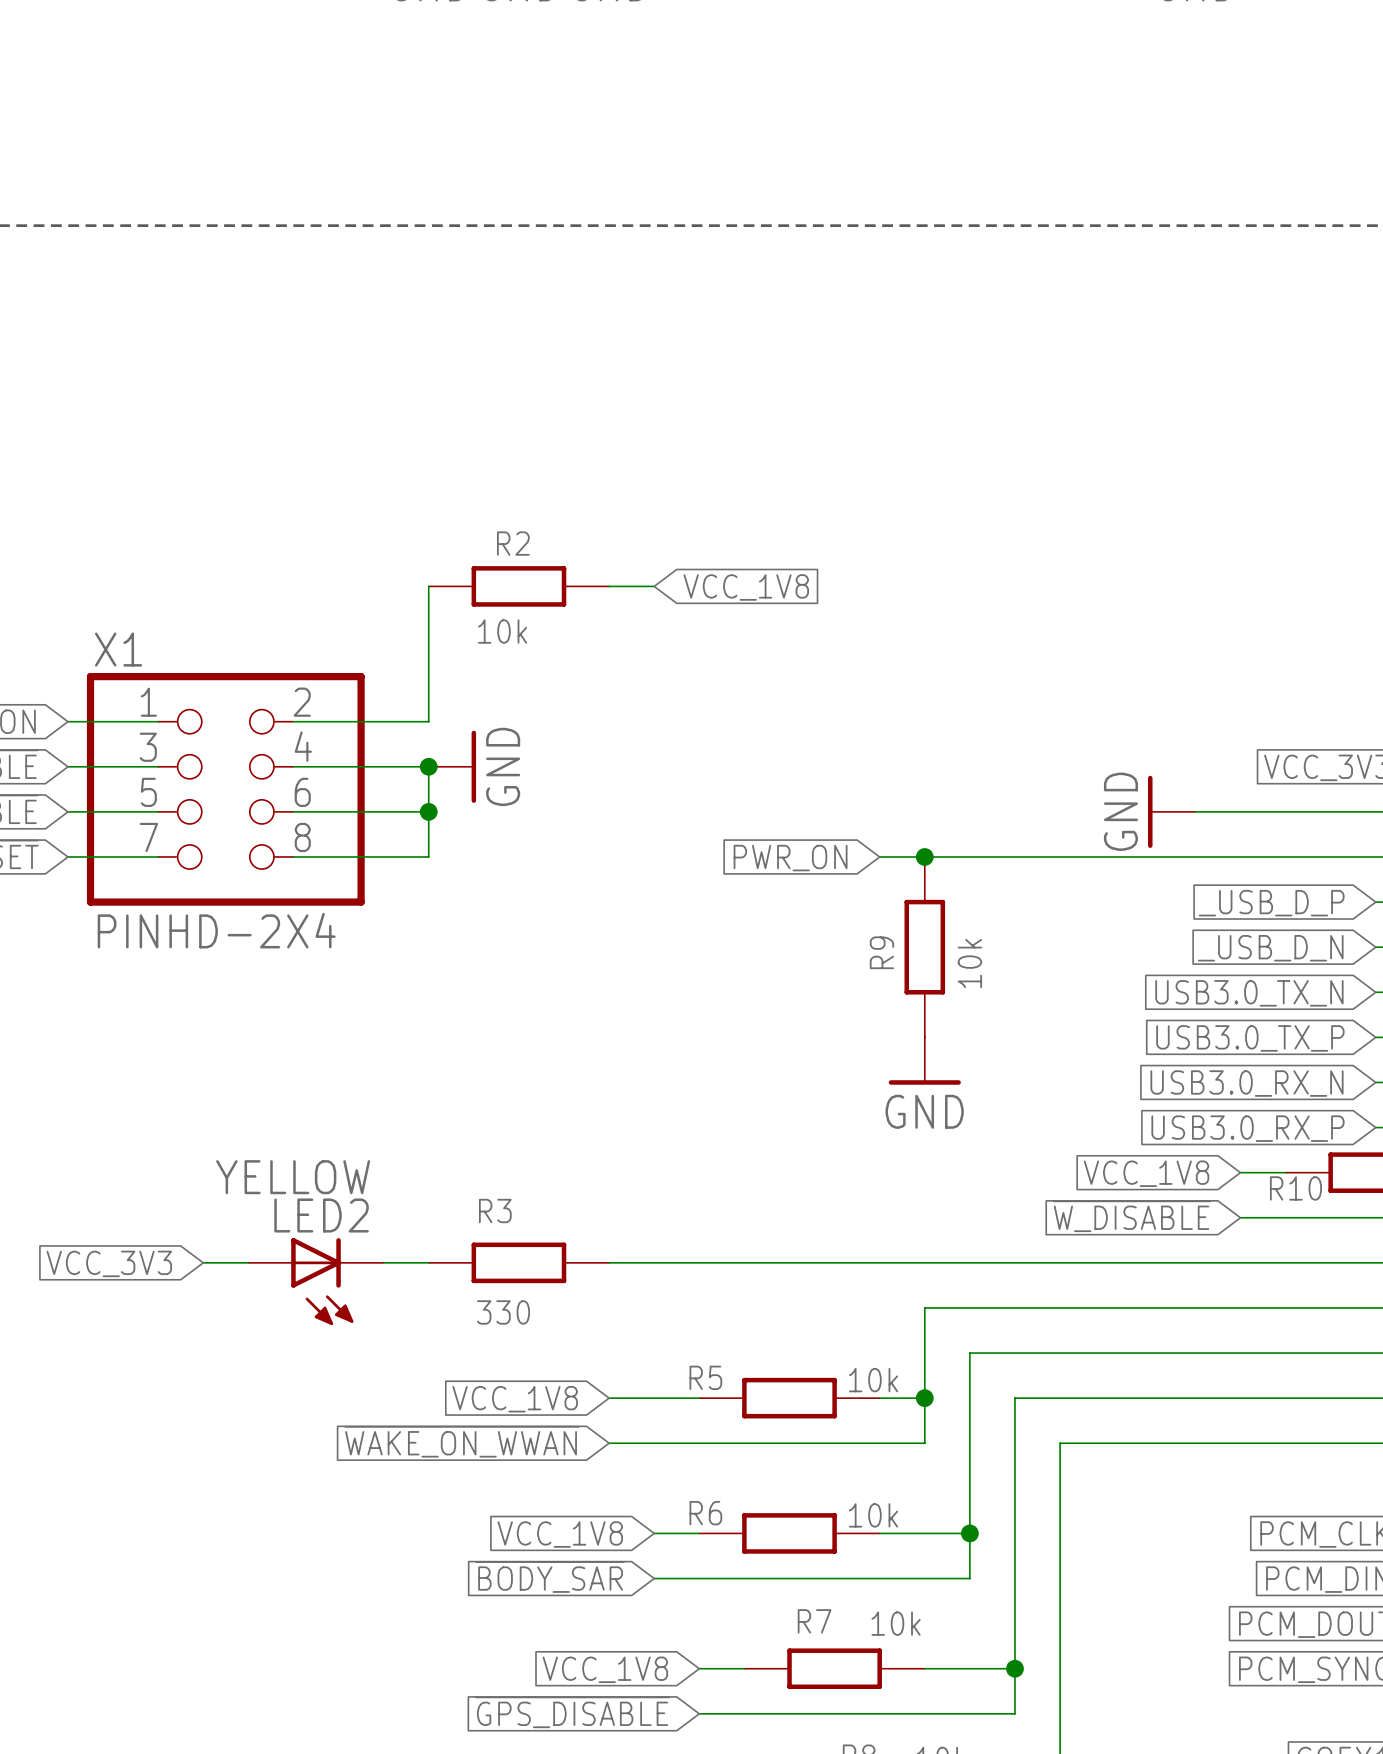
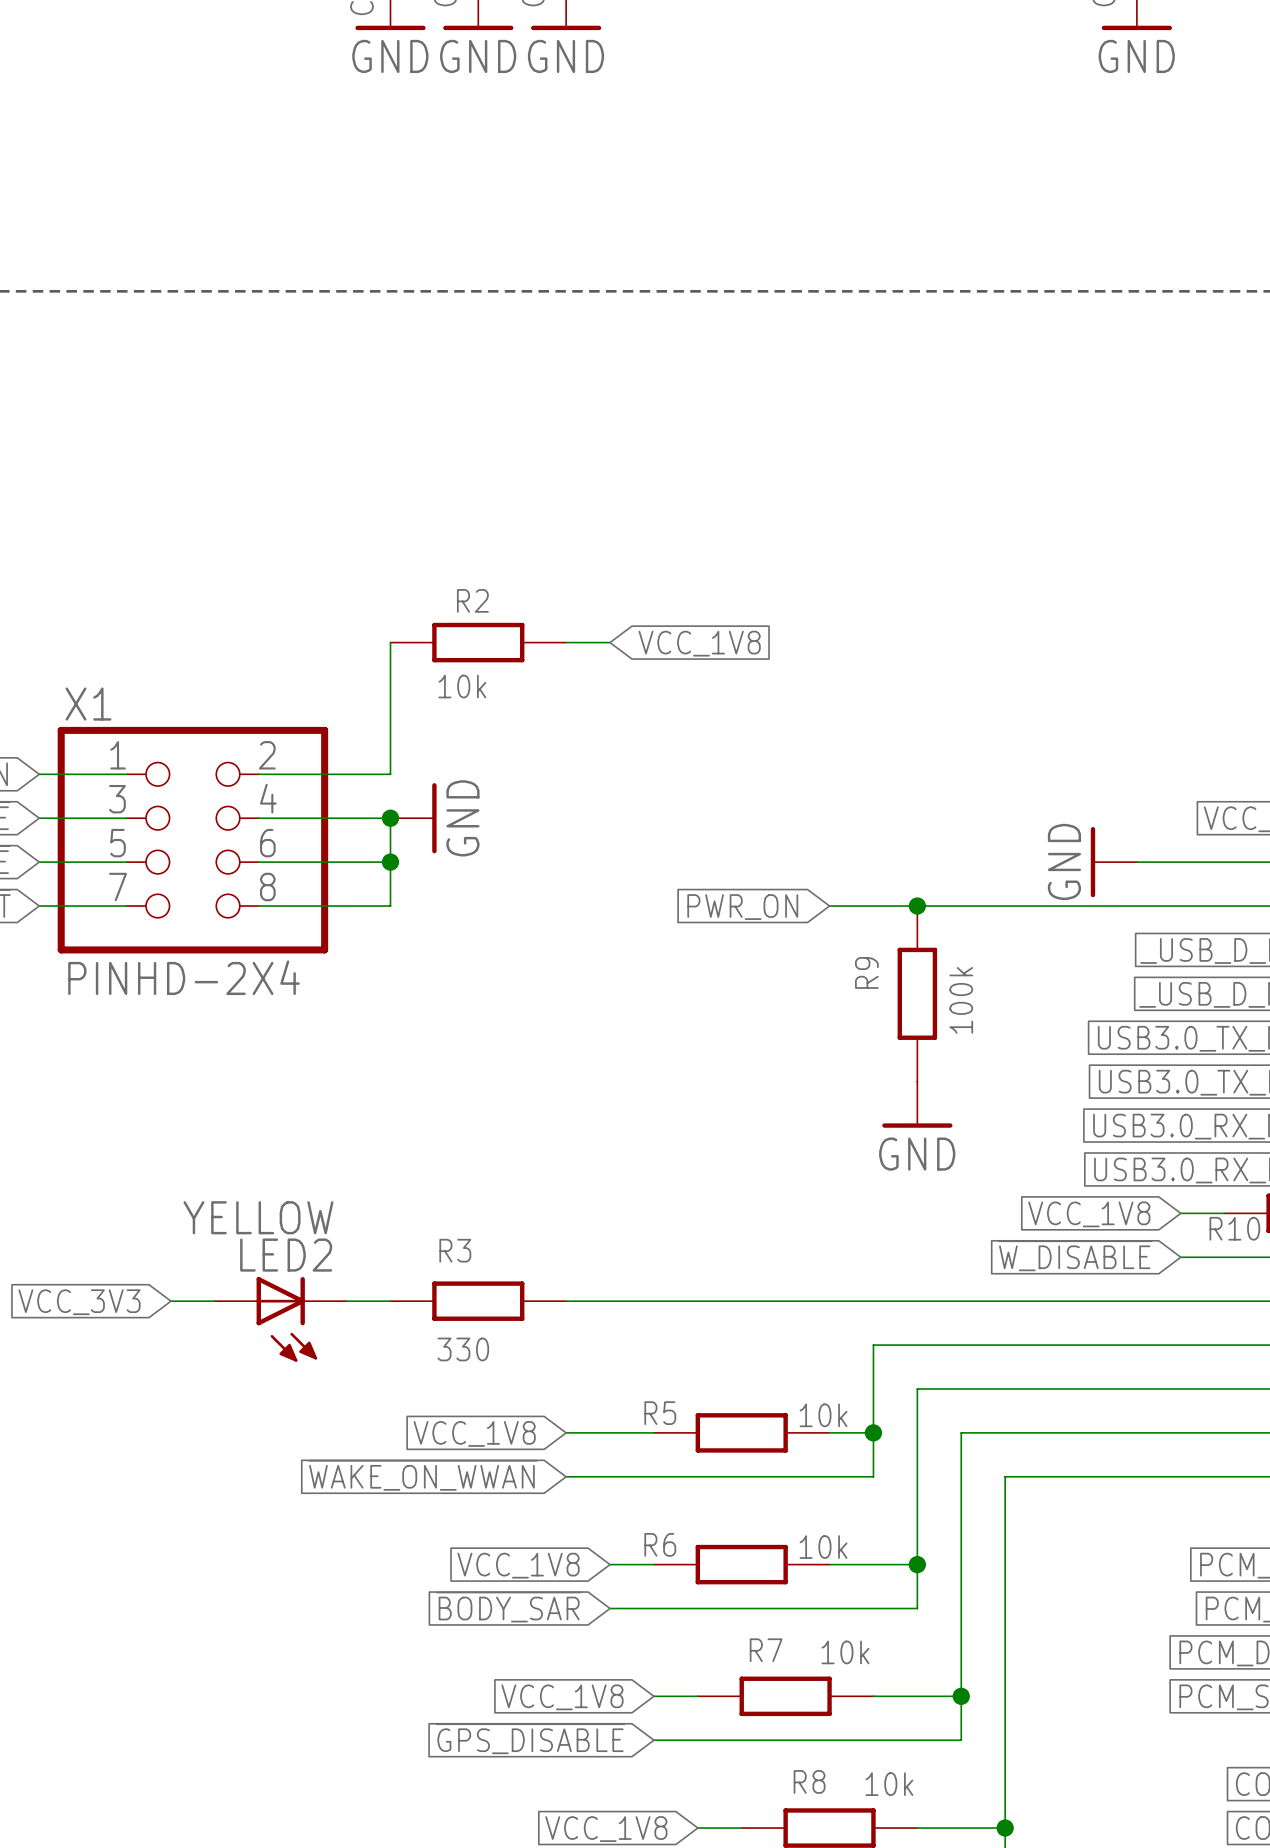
junction position: (924, 856) -> (917, 906)
R9 position: (924, 947) -> (917, 993)
R9 name position: R9 (881, 952) -> R9 (866, 972)
R9 value: 10k (969, 963) -> 100k (961, 1000)
power symbol position: GND (924, 1061) -> GND (917, 1104)

